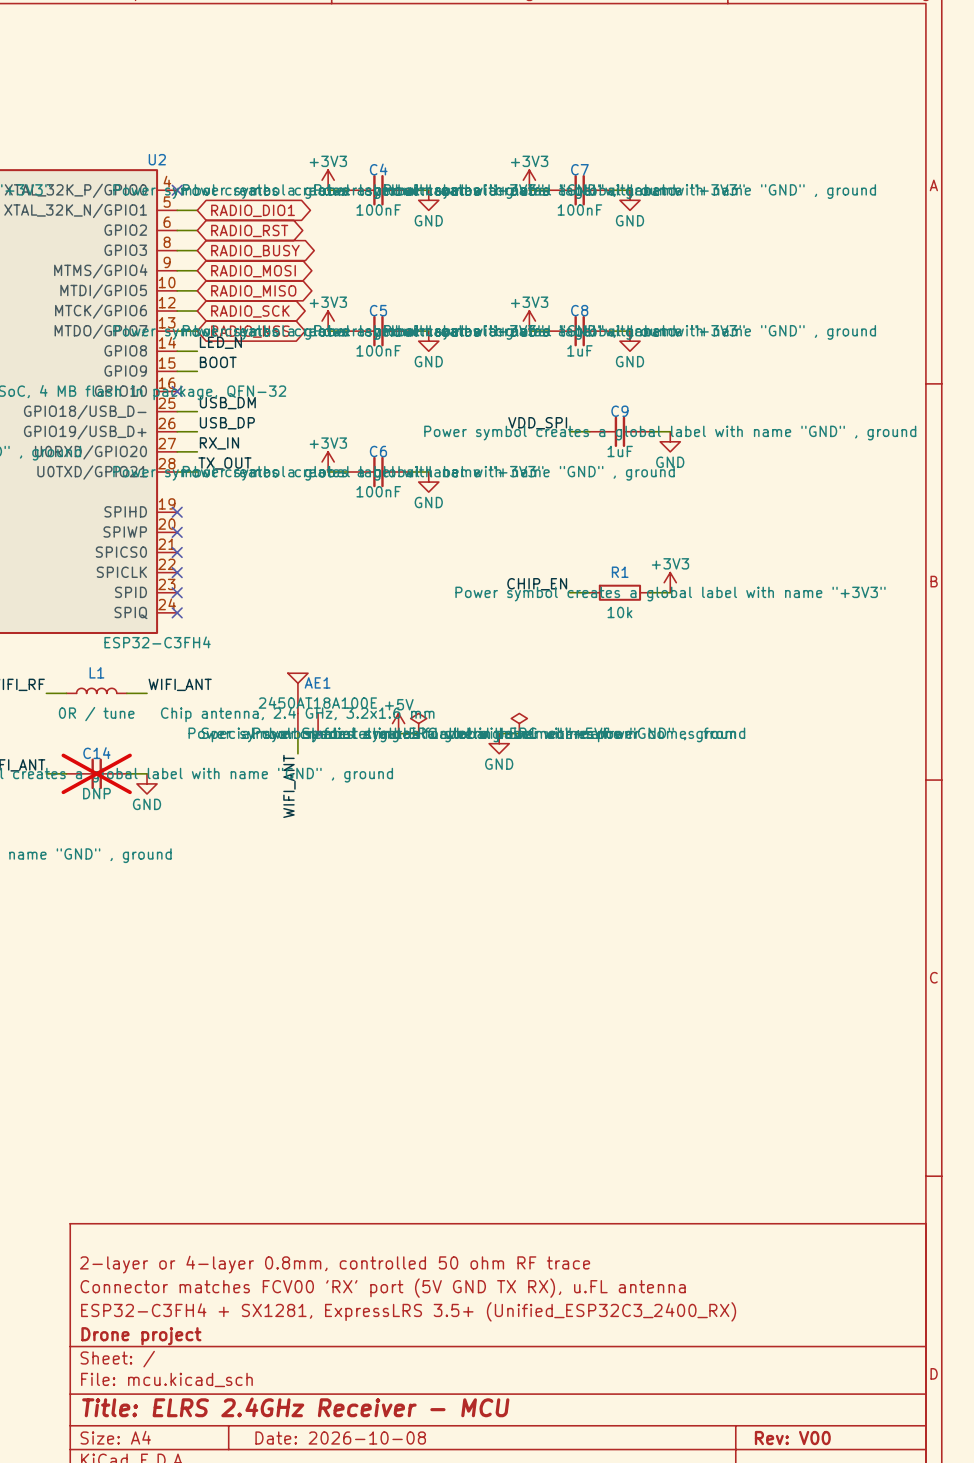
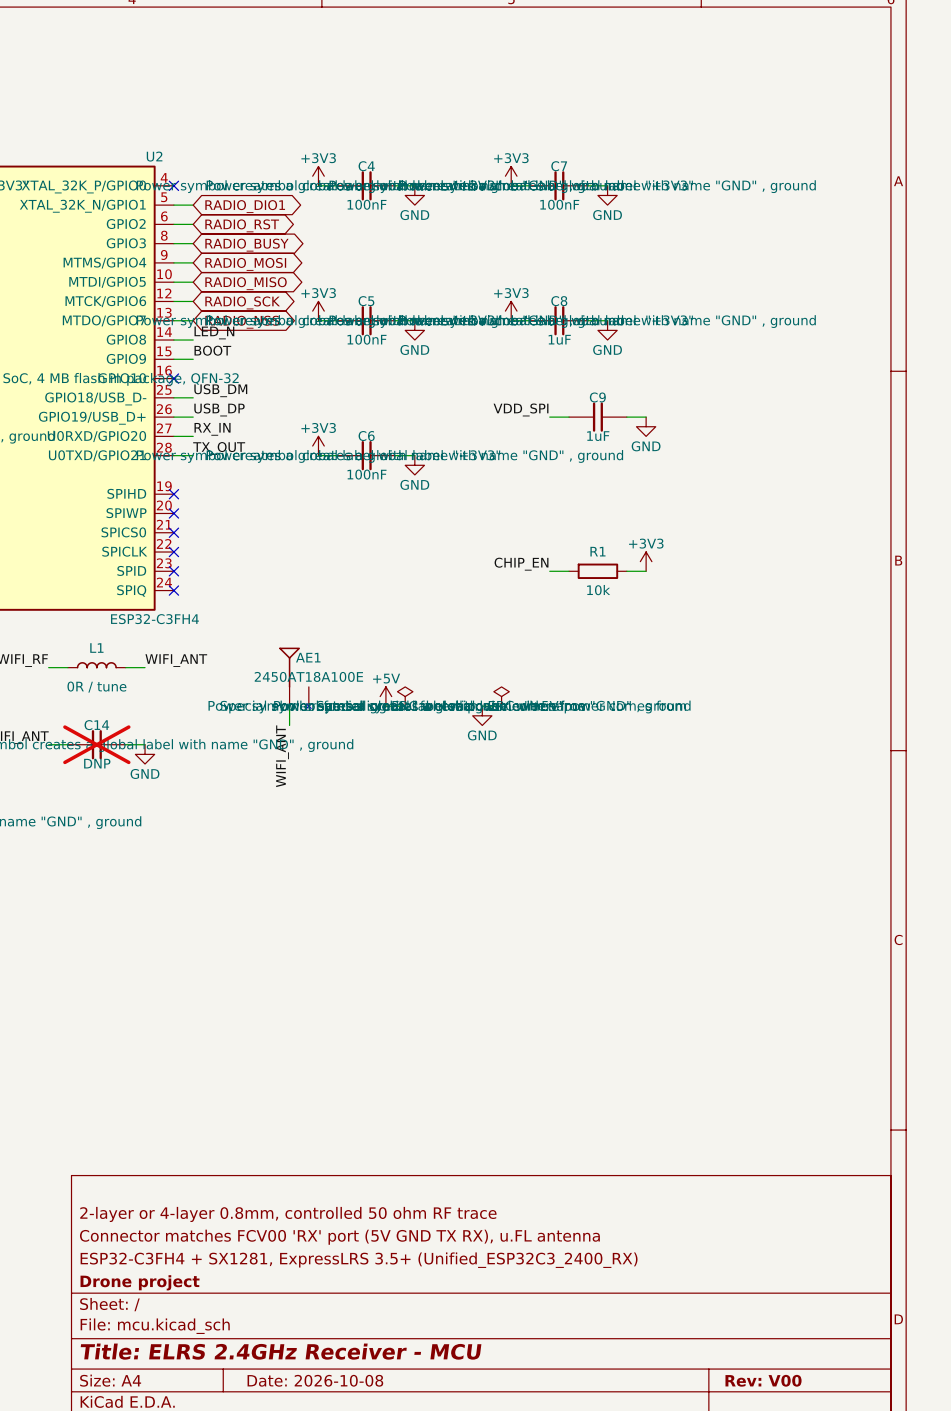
power symbol text: Power symbol creates a global label with name "GND" , ground (670, 433) -> none
power symbol text: Power symbol creates a global label with name "+3V3" (670, 594) -> none
AE1 text: Chip antenna, 2.4 GHz, 3.2x1.6 mm (297, 714) -> none

